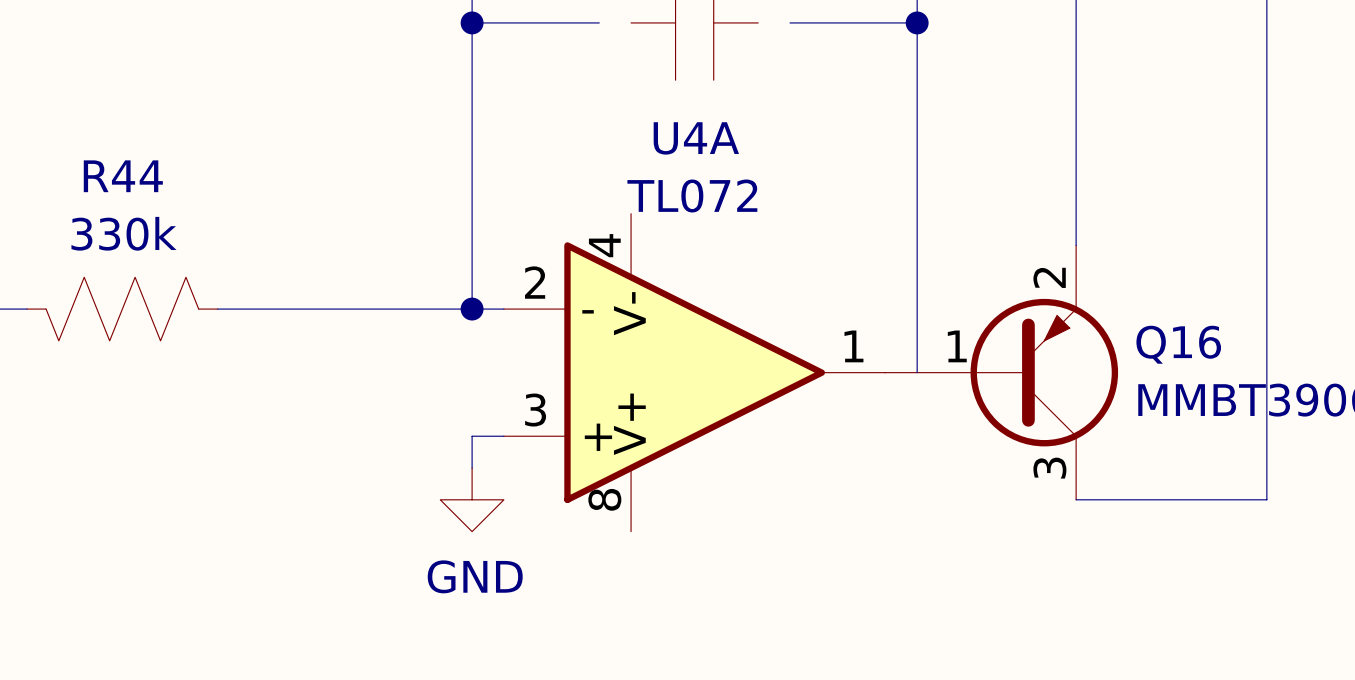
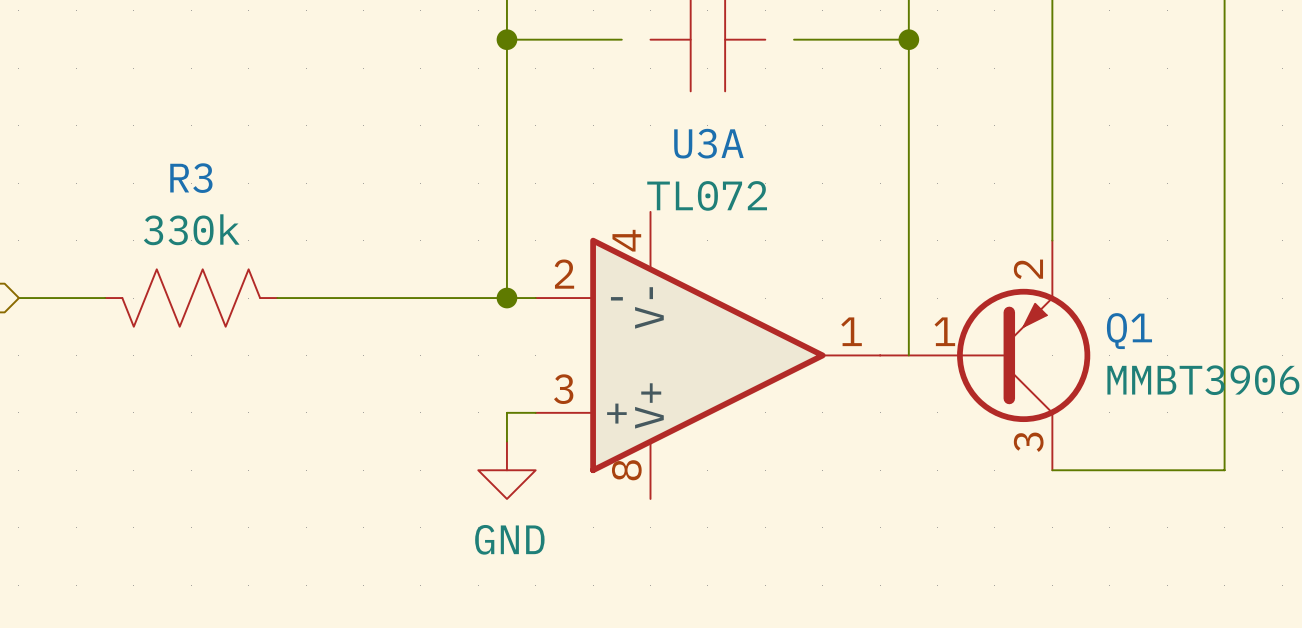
U4A name: U4A (696, 138) -> U3A (708, 143)
R44 name: R44 (123, 176) -> R3 (191, 178)
Q16 name: Q16 (1178, 344) -> Q1 (1129, 331)

